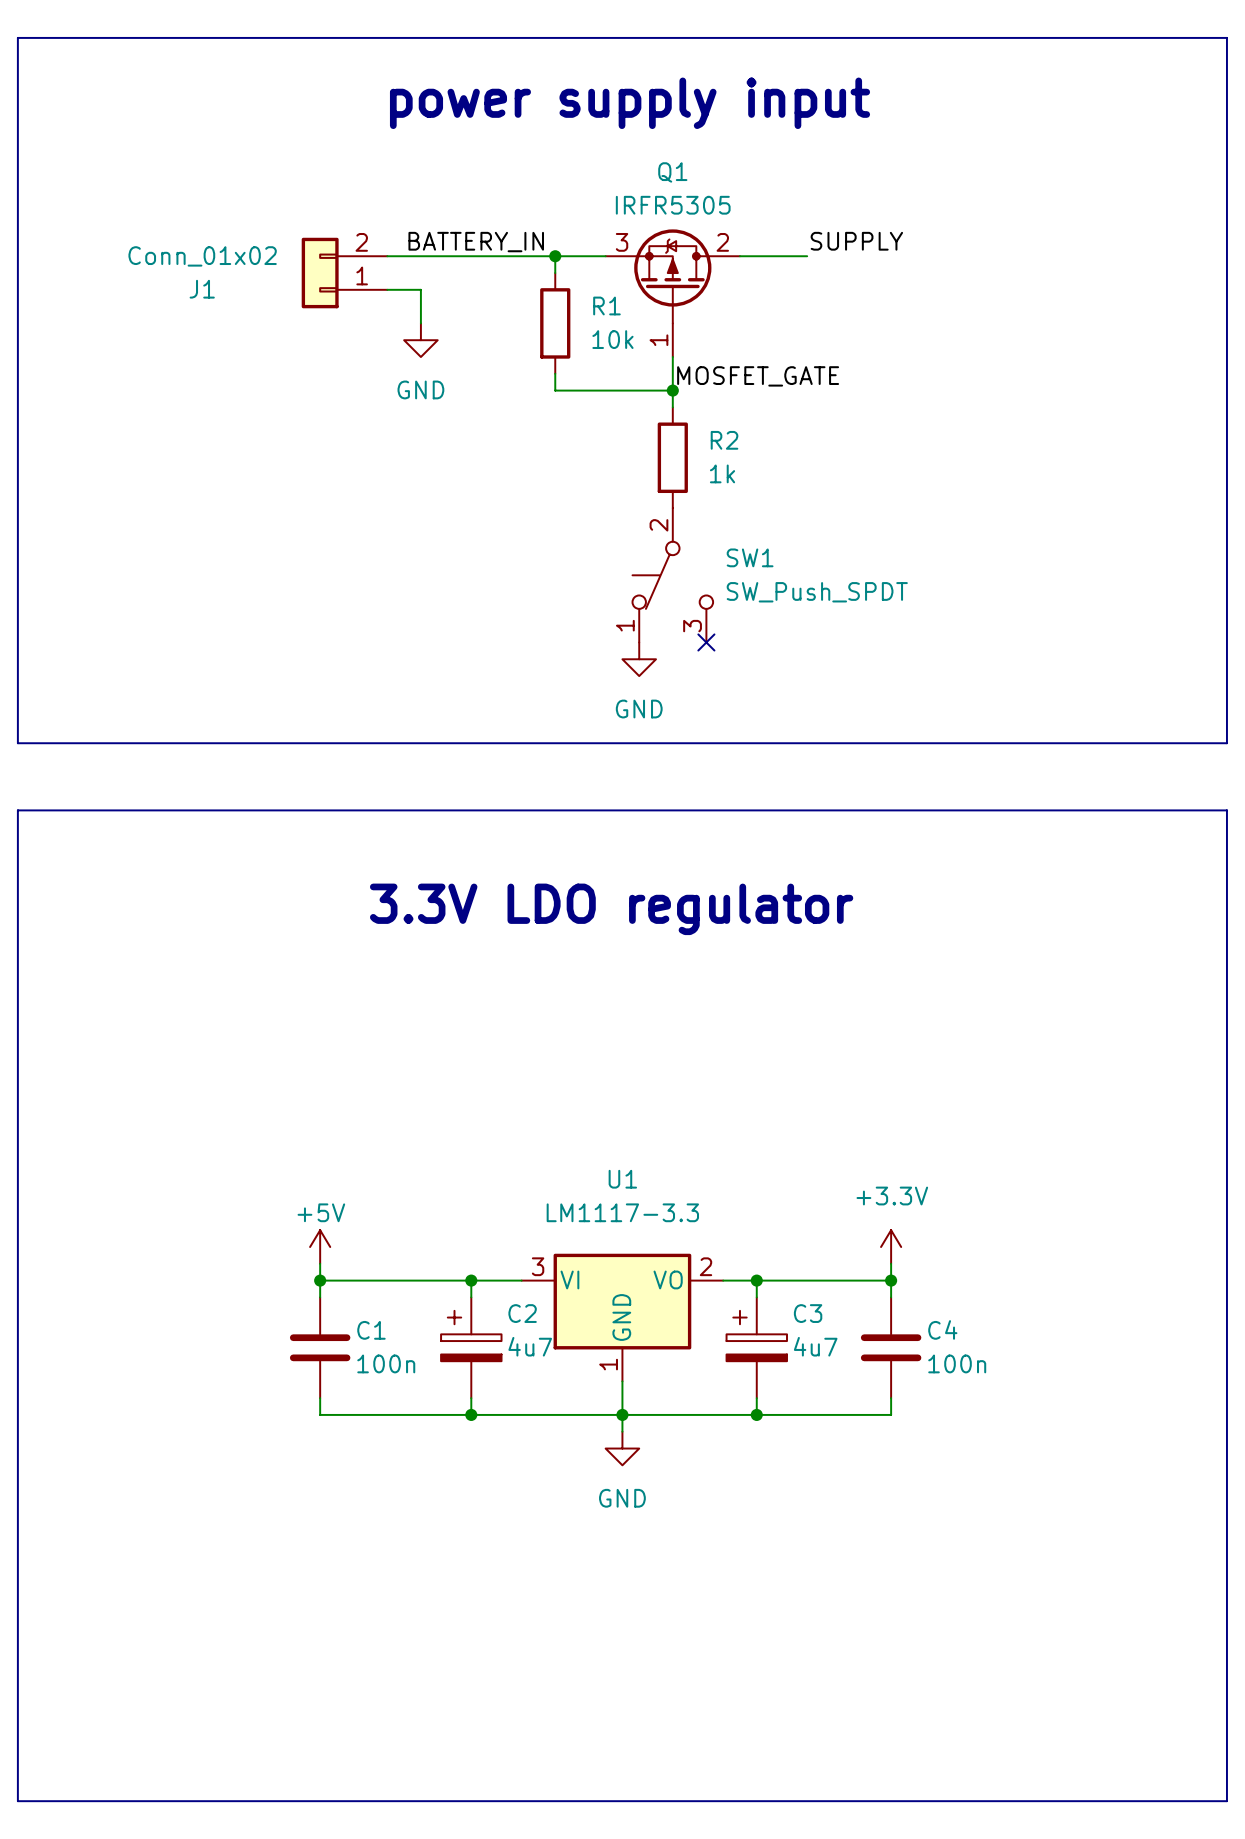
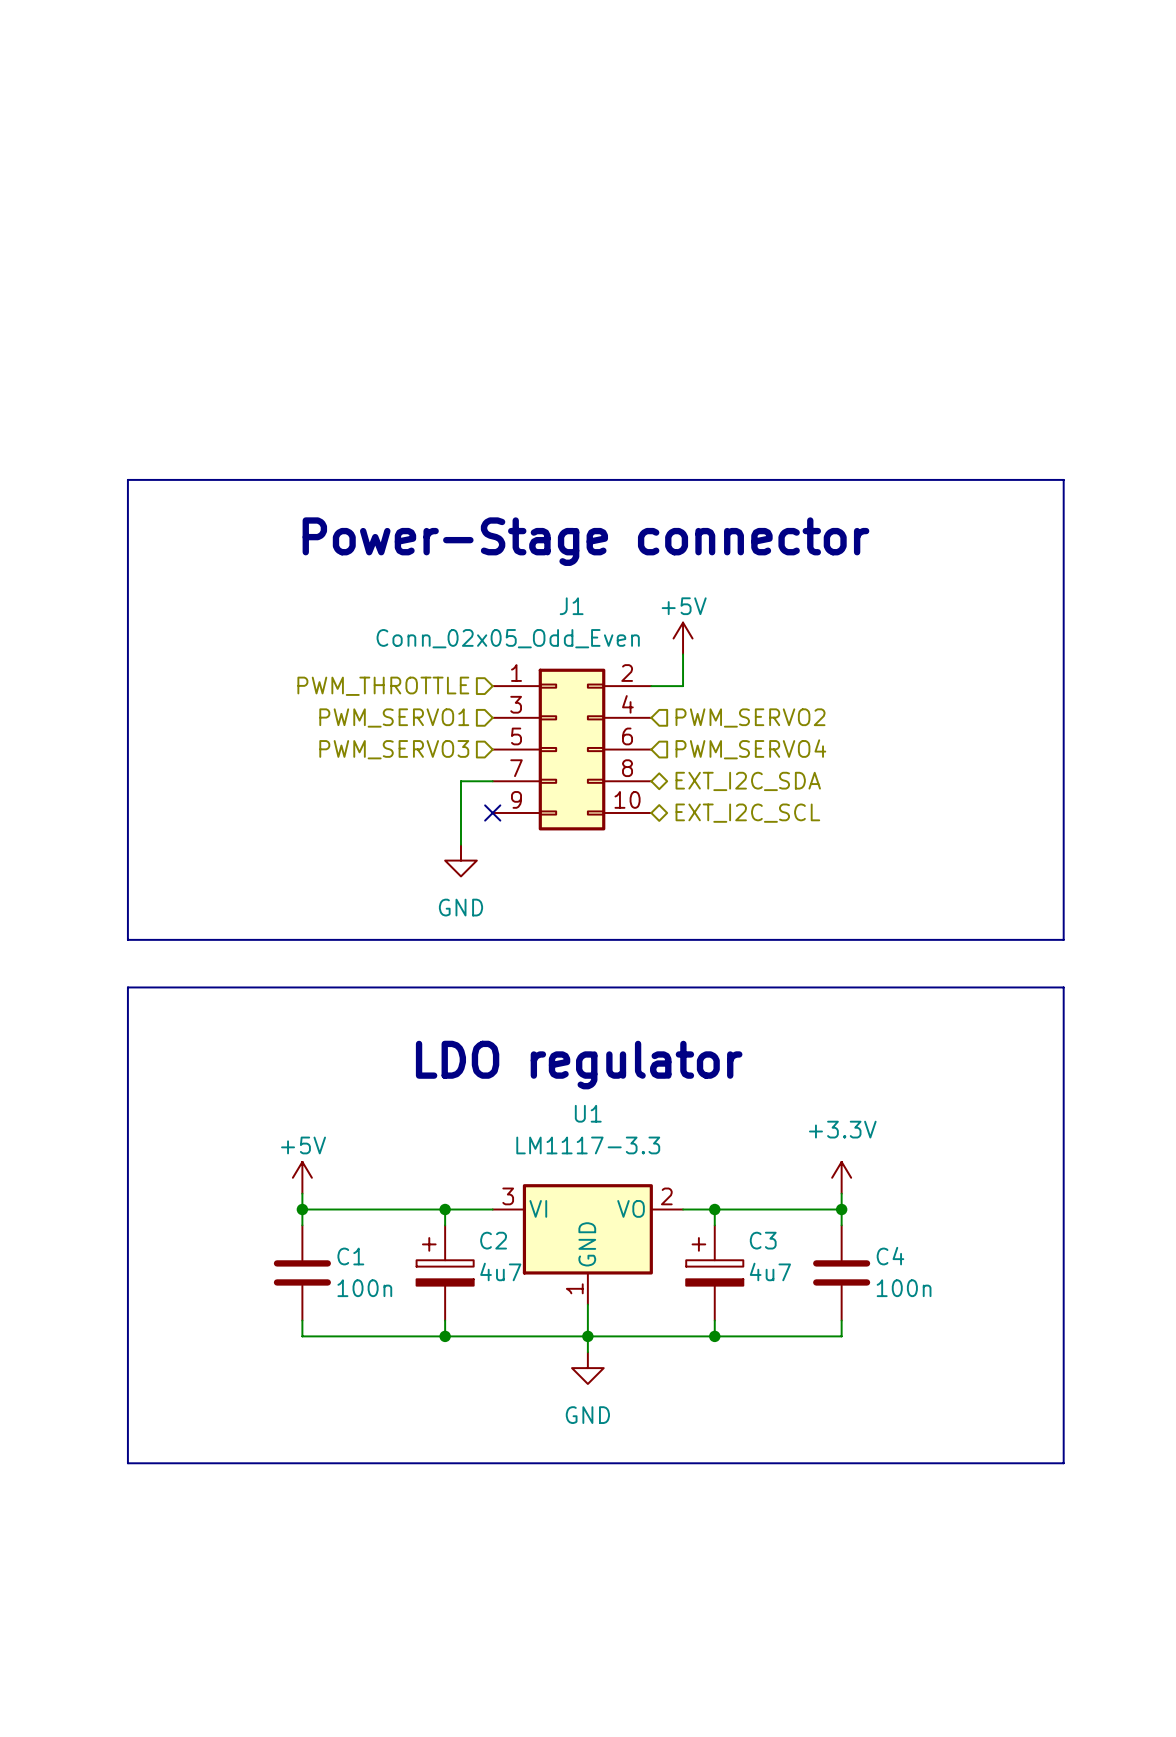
line: (17, 37) (17, 743) (1226, 743) (1226, 37) (17, 37) -> none
text: power supply input (630, 103) -> none
J1 symbol: [301, 237, 388, 309] -> [492, 668, 652, 831]
label: SUPPLY (856, 241) -> none
label: BATTERY_IN (476, 242) -> none
J1 value: Conn_01x02 (202, 256) -> Conn_02x05_Odd_Even (508, 638)
wire: (387, 256) (605, 256) -> none
wire: (555, 256) (555, 273) -> none
junction: (555, 256) -> none
wire: (739, 256) (807, 256) -> none
J1 name position: J1 (202, 289) -> J1 (571, 606)
wire: (387, 289) (420, 289) (420, 323) -> none
Q1: IRFR5305 (672, 293) -> none
R1: 10k (555, 323) -> none
power symbol: GND (420, 340) -> none
wire: (672, 356) (672, 407) -> none
wire: (555, 373) (555, 390) (672, 390) -> none
label: MOSFET_GATE (758, 376) -> none
junction: (672, 390) -> none
R2: 1k (672, 457) -> none
line: none -> (127, 479) (127, 939) (1063, 939) (1063, 479) (127, 479)
text: none -> Power-Stage connector (585, 541)
SW1: SW_Push_SPDT (672, 575) -> none
no-connect mark: (706, 642) -> none
power symbol: GND (639, 659) -> none
power symbol: none -> +5V (683, 638)
wire: none -> (683, 654) (683, 686) (651, 686)
hierarchical label: none -> PWM_THROTTLE (383, 686)
hierarchical label: none -> PWM_SERVO1 (394, 717)
hierarchical label: none -> PWM_SERVO2 (750, 717)
hierarchical label: none -> PWM_SERVO3 (394, 749)
hierarchical label: none -> PWM_SERVO4 (750, 749)
line: (17, 810) (17, 1801) (1226, 1801) (1226, 810) (17, 810) -> none
wire: none -> (492, 781) (460, 781) (460, 844)
hierarchical label: none -> EXT_I2C_SDA (748, 781)
no-connect mark: none -> (492, 812)
hierarchical label: none -> EXT_I2C_SCL (747, 813)
text: 3.3V LDO regulator (611, 909) -> none
power symbol: none -> GND (460, 860)
line: none -> (127, 987) (127, 1463) (1063, 1463) (1063, 987) (127, 987)
text: none -> LDO regulator (579, 1065)

